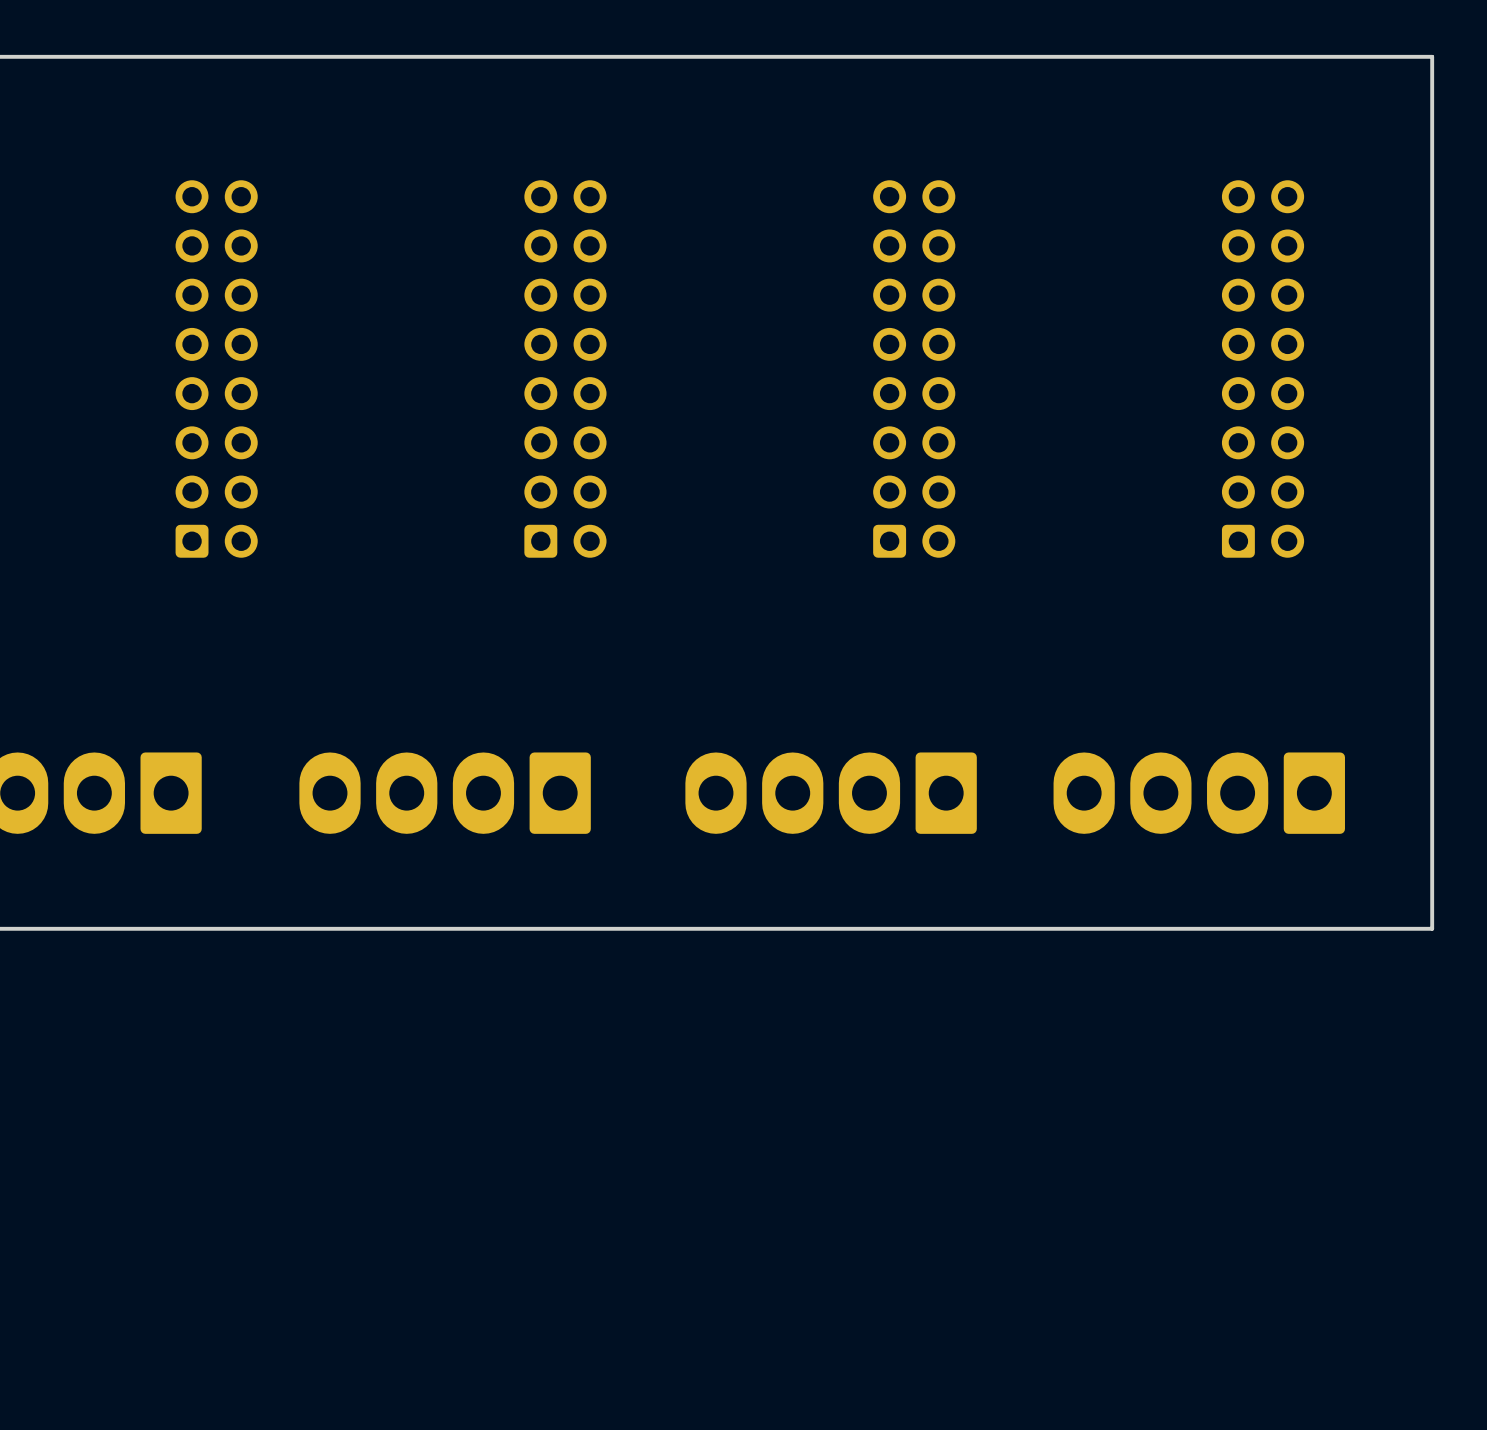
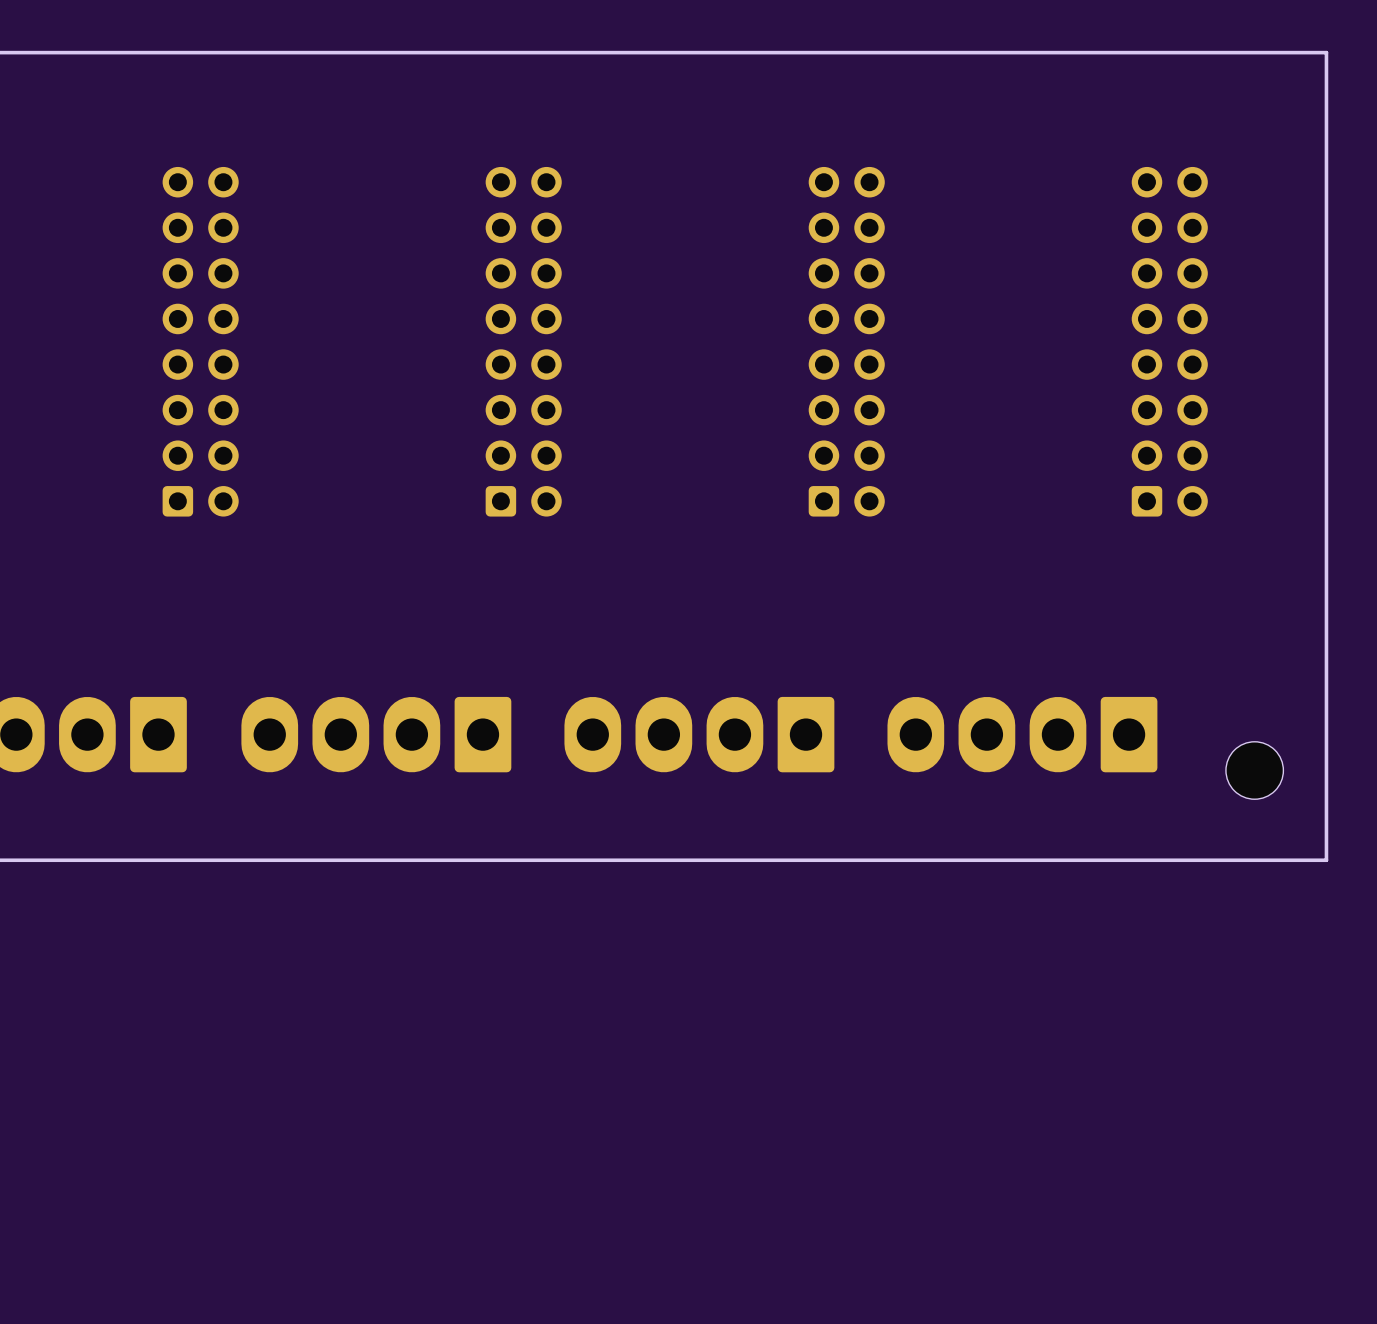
part position: (445, 793) -> (376, 734)
part position: (831, 793) -> (699, 734)
part position: (1199, 793) -> (1022, 734)
part: none -> (1254, 770)

